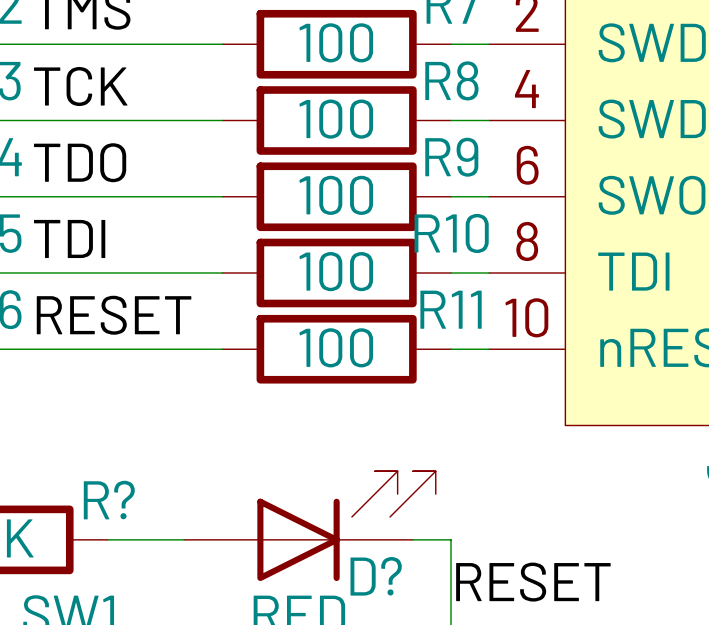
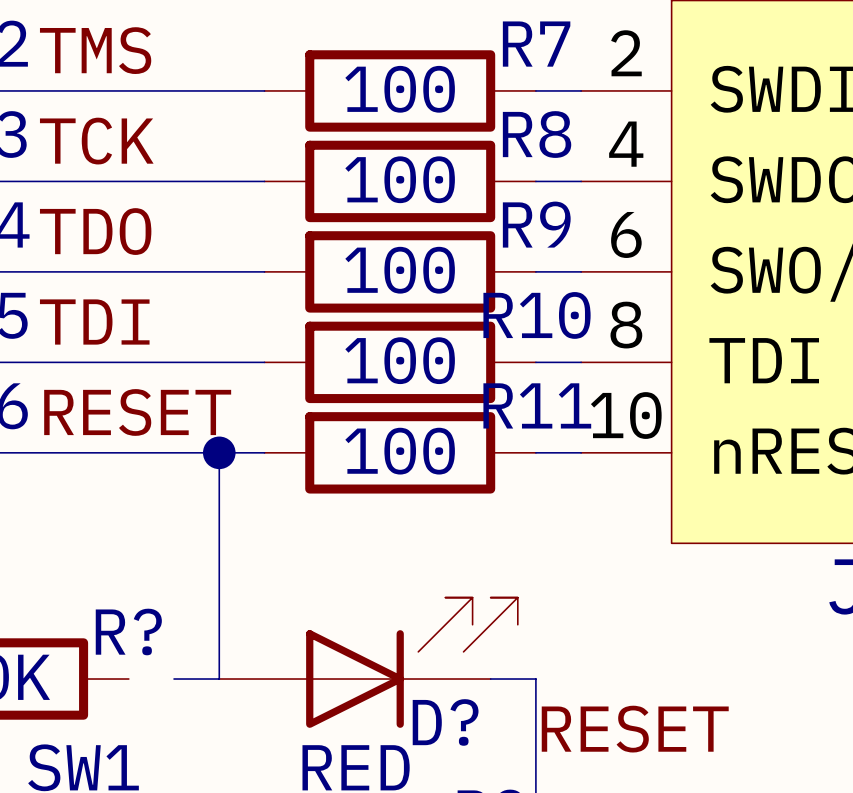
wire: none -> (219, 452) (219, 679)
junction: none -> (219, 452)
wire: (107, 539) (146, 539) -> none

